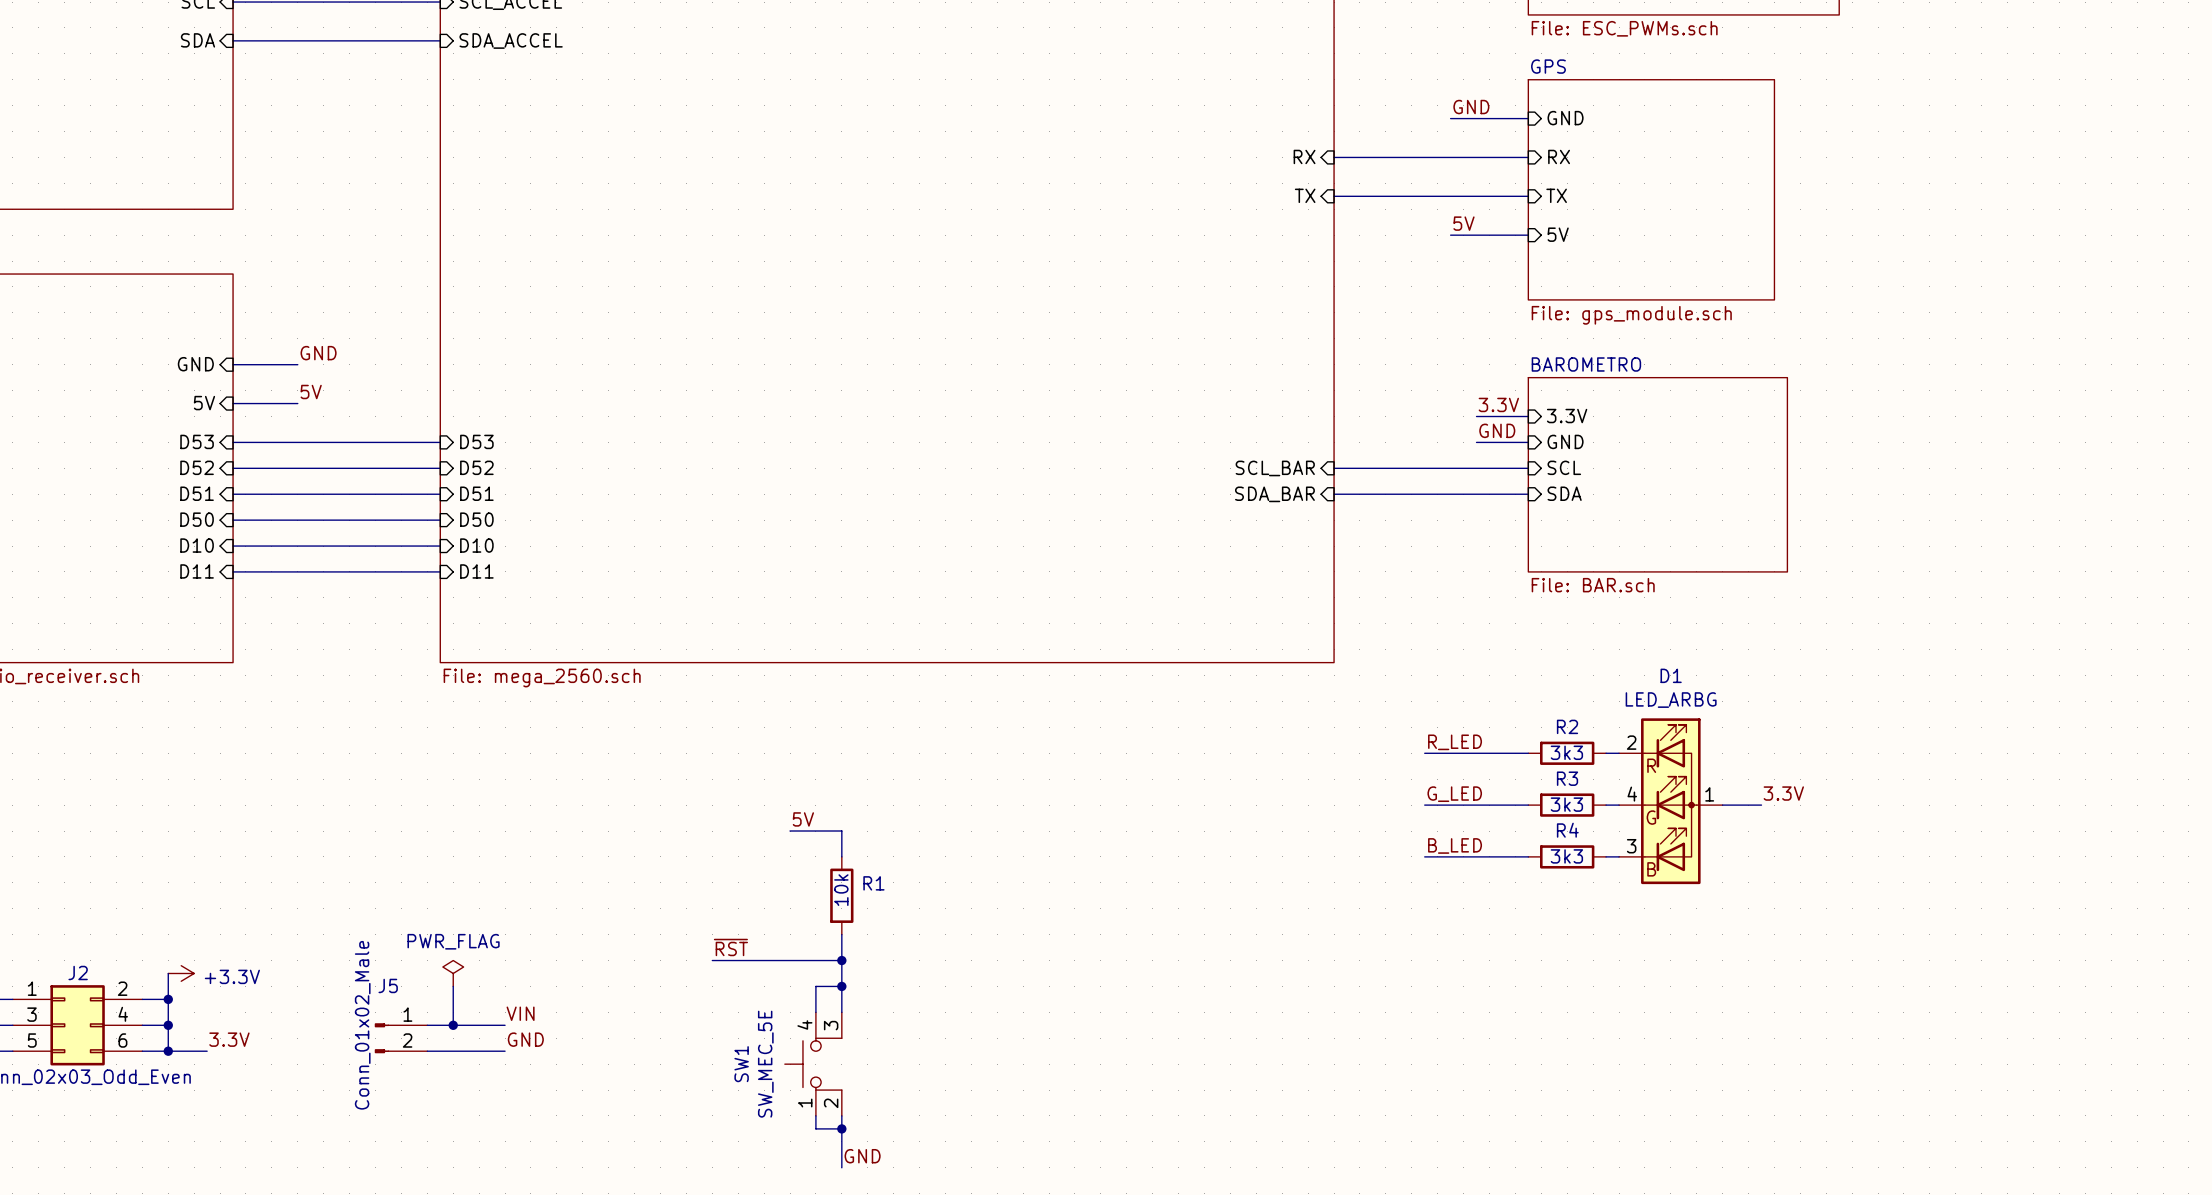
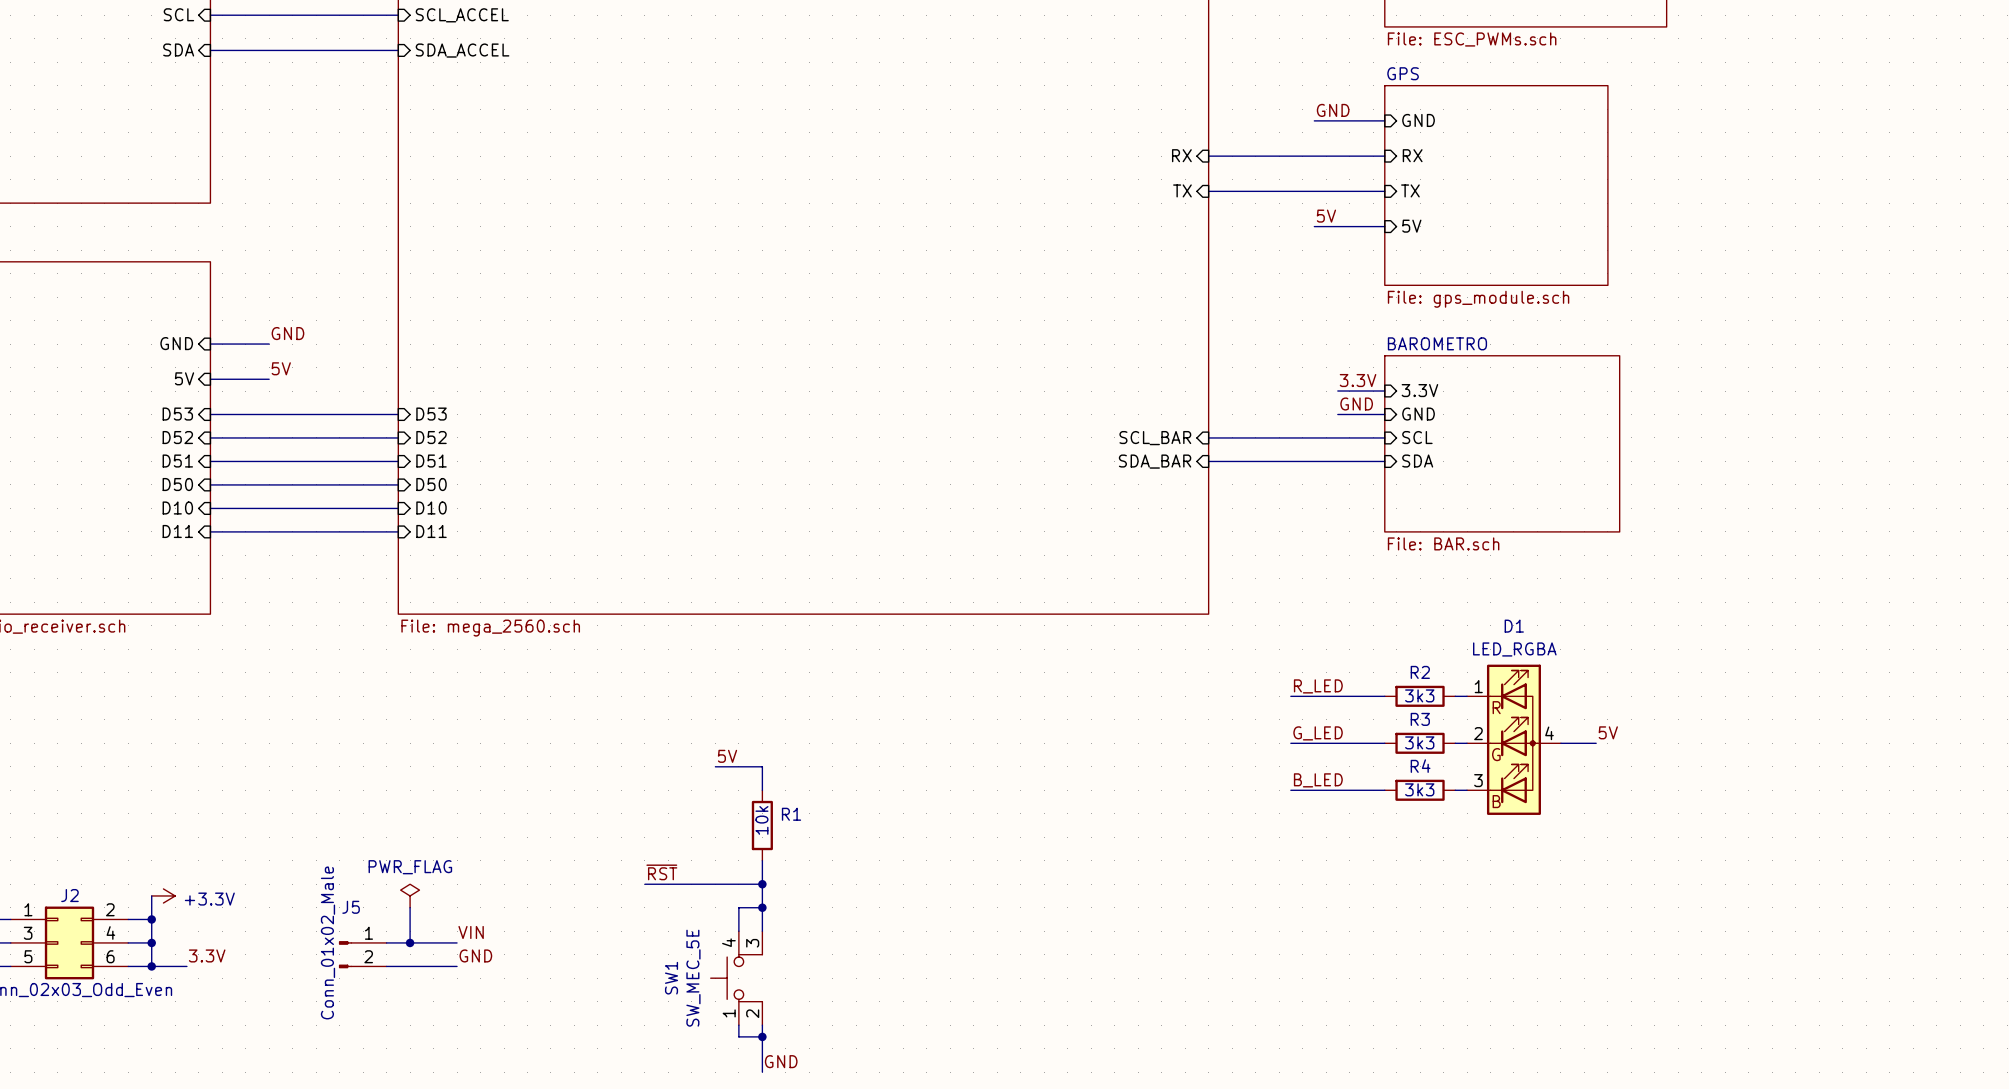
D1 value: LED_ARBG (1671, 700) -> LED_RGBA (1514, 649)
D1 pin number: 2 (1631, 742) -> 1 (1478, 686)
label: 3.3V (1783, 793) -> 5V (1608, 732)
D1 pin number: 4 (1632, 794) -> 2 (1478, 733)
D1 pin number: 1 (1709, 794) -> 4 (1549, 733)

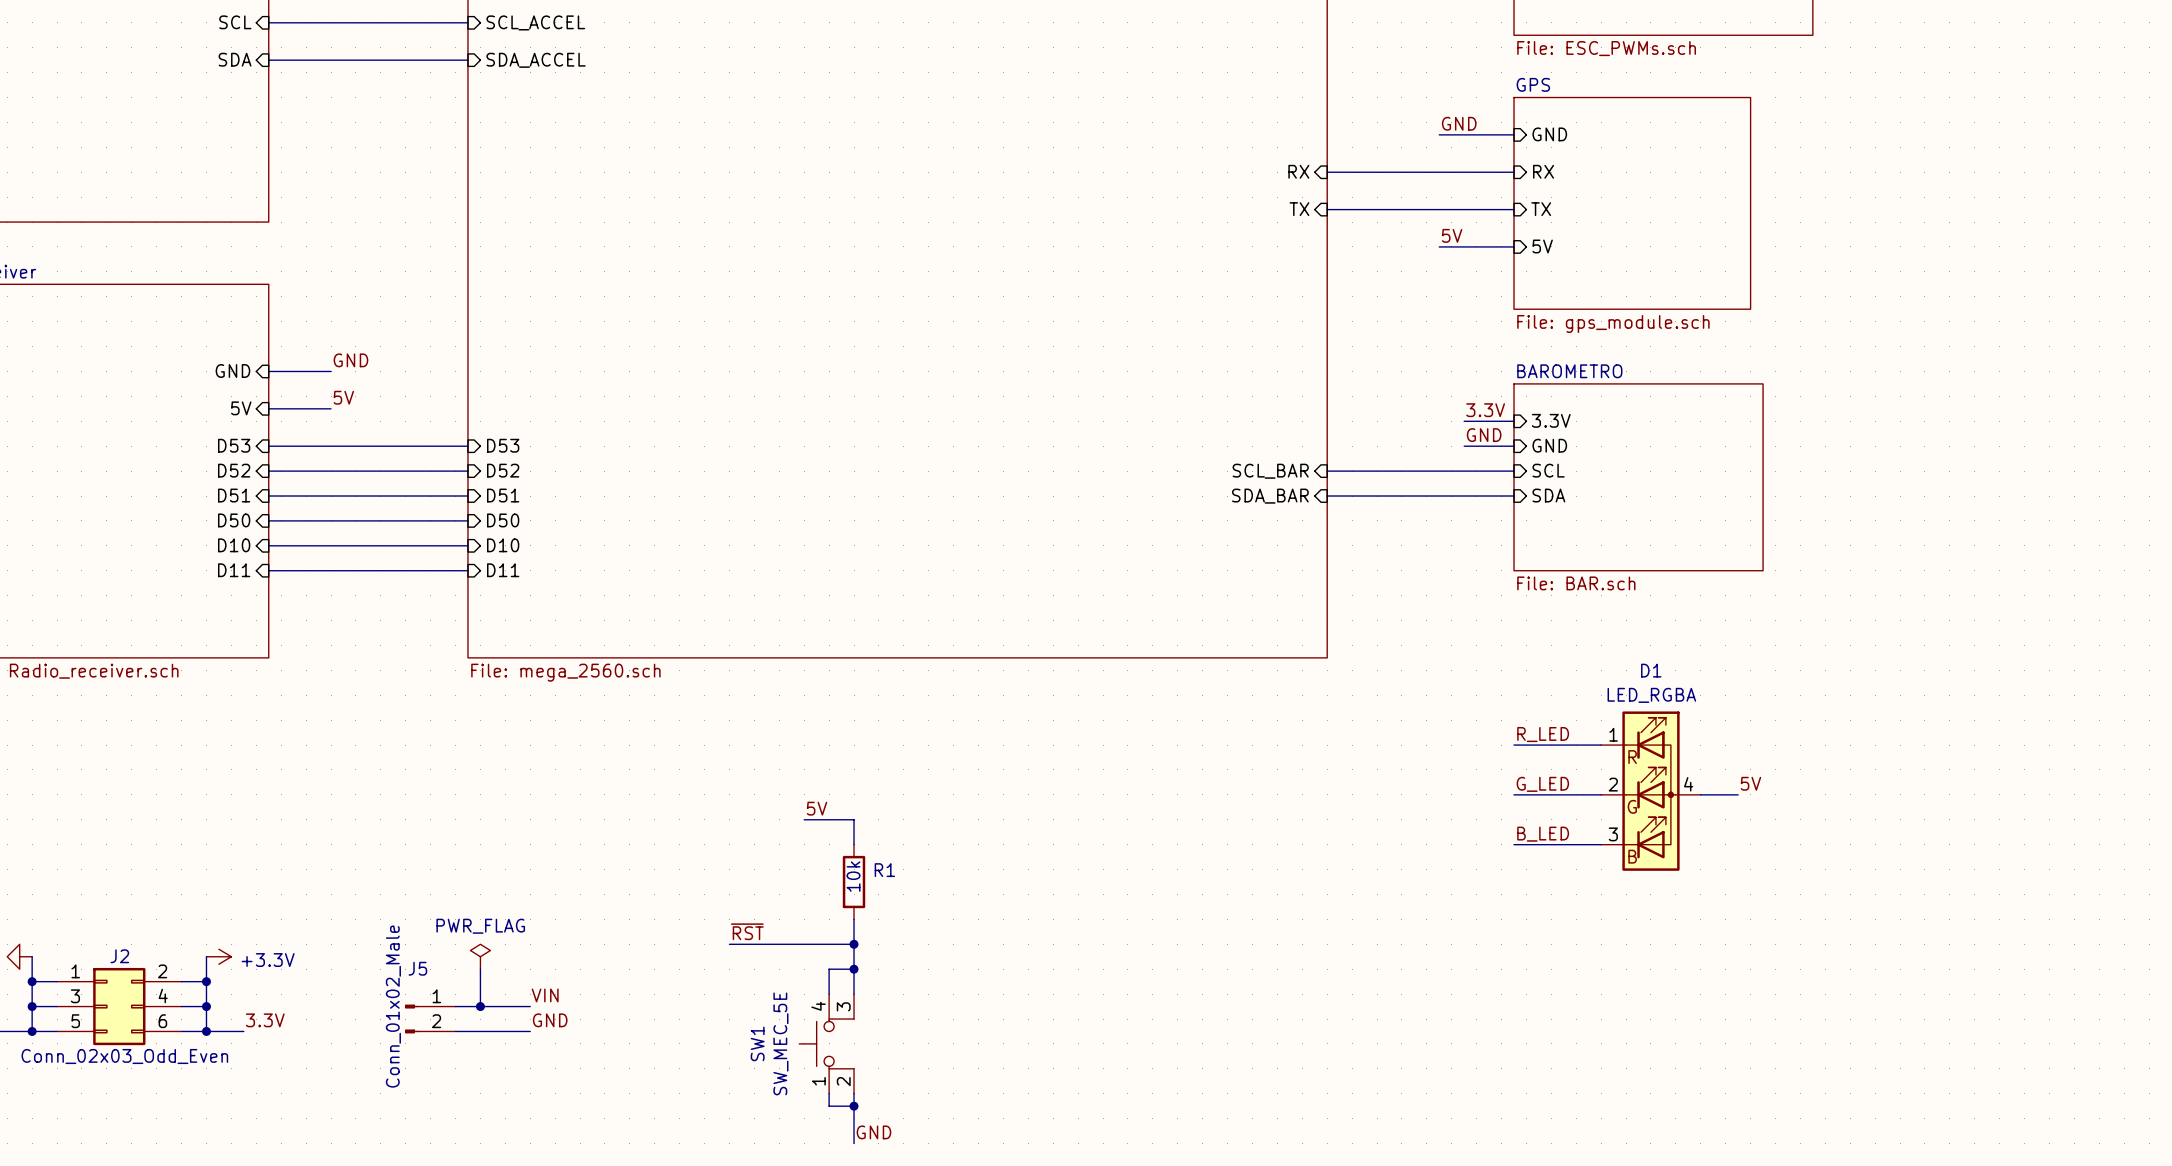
label position: R_LED (1318, 686) -> R_LED (1543, 734)
wire: (1290, 696) (1384, 696) -> (1588, 745) (1513, 745)
R2: 3k3 (1420, 696) -> none
label position: G_LED (1318, 733) -> G_LED (1542, 784)
wire: (1290, 743) (1384, 743) -> (1588, 794) (1513, 794)
R3: 3k3 (1420, 743) -> none
label position: B_LED (1318, 780) -> B_LED (1543, 834)
wire: (1290, 790) (1384, 790) -> (1588, 844) (1513, 844)
R4: 3k3 (1420, 790) -> none

